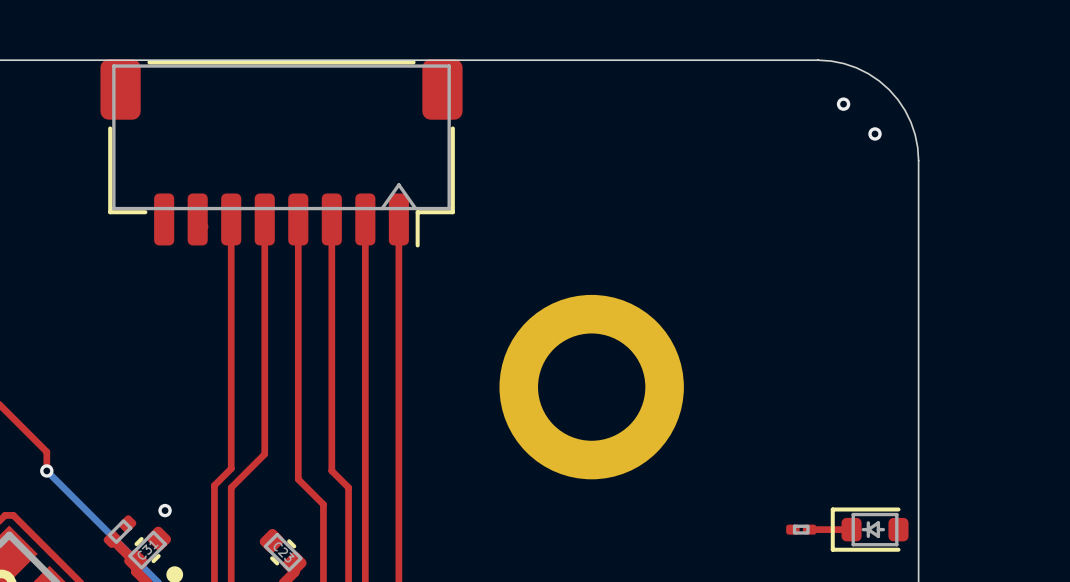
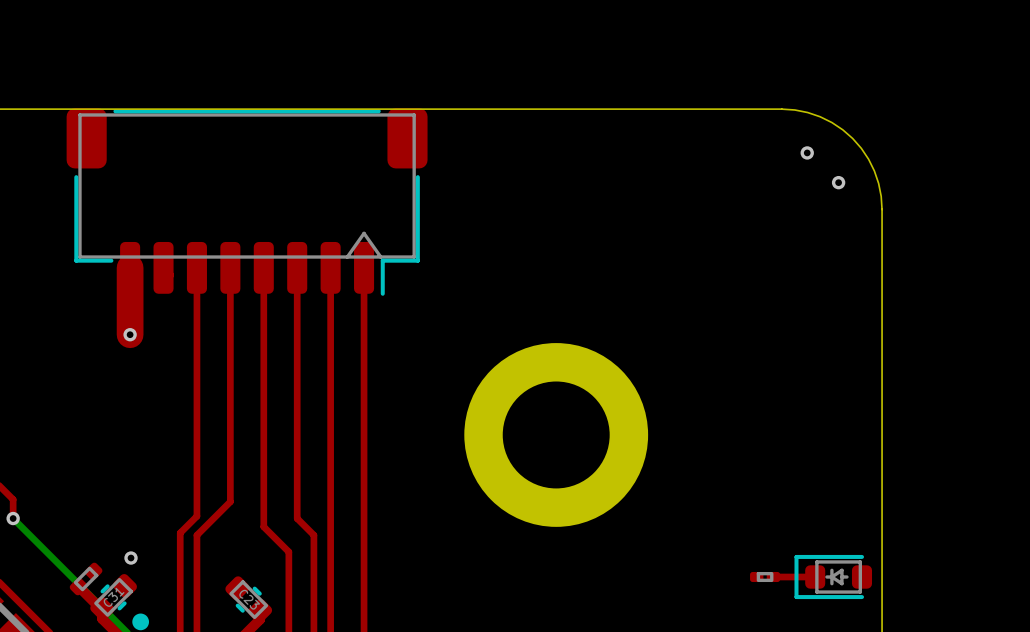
top track: none -> (130, 267) (130, 334)
via: none -> (130, 334)

